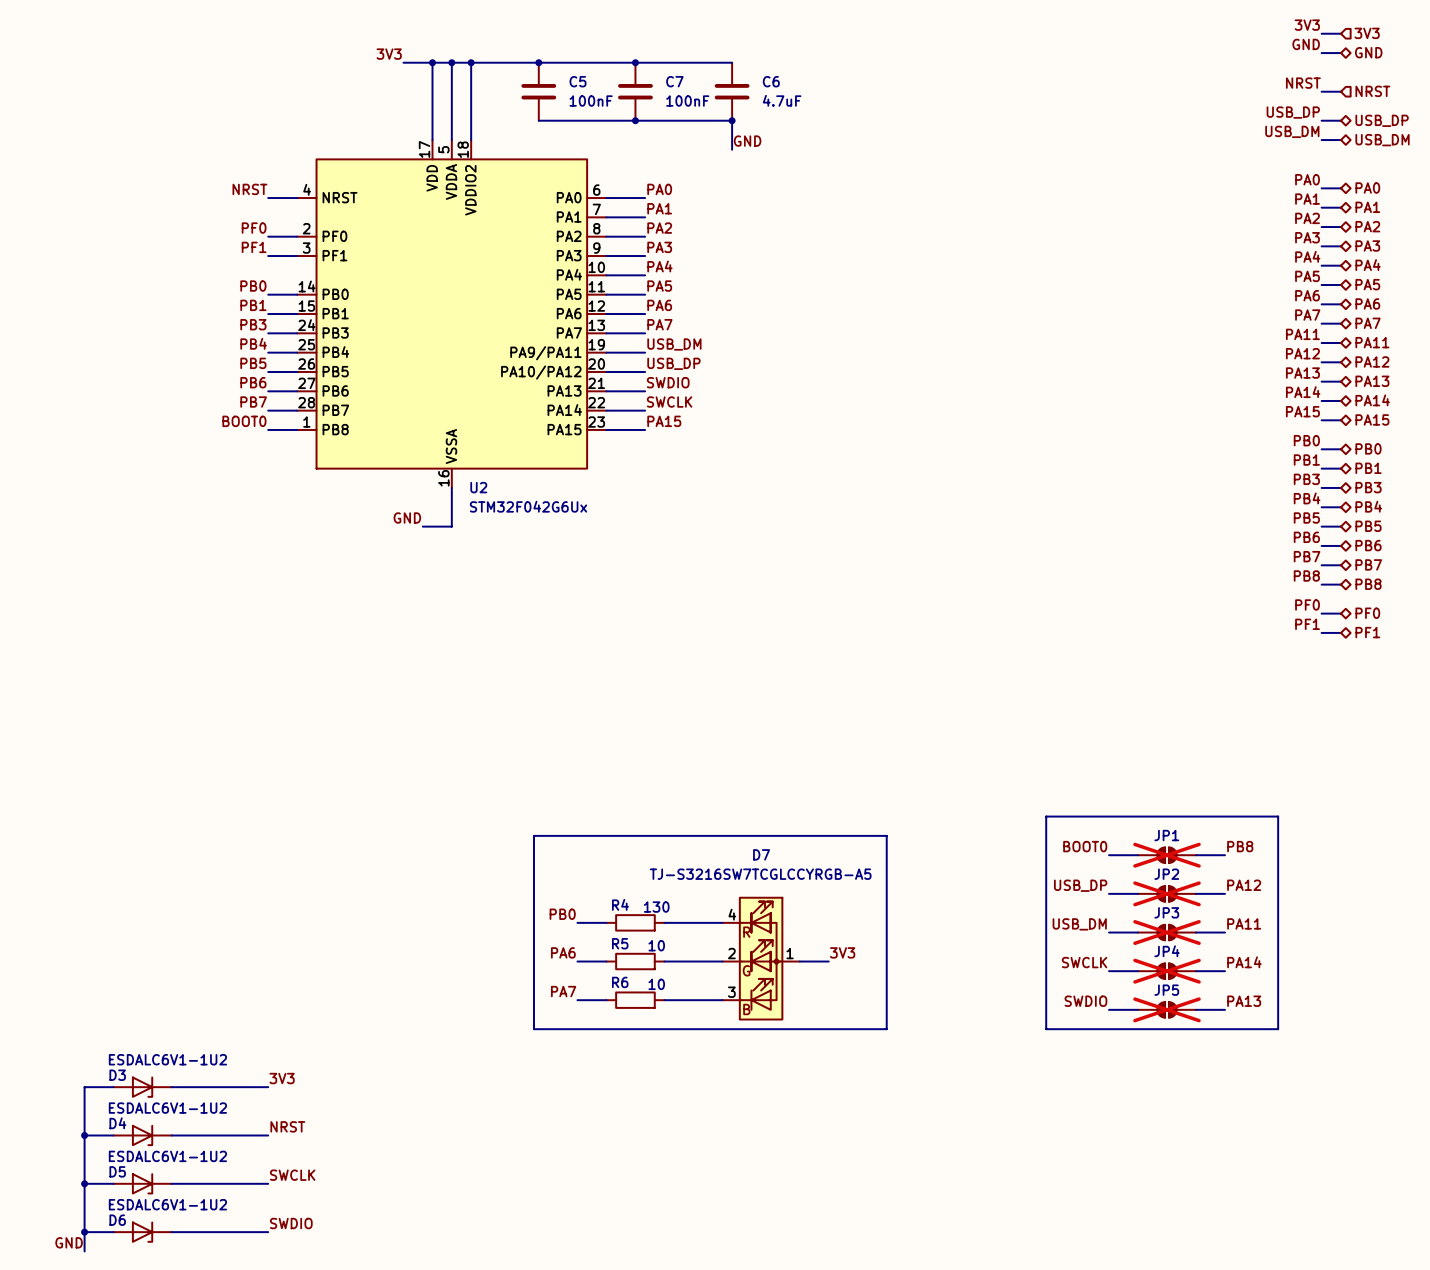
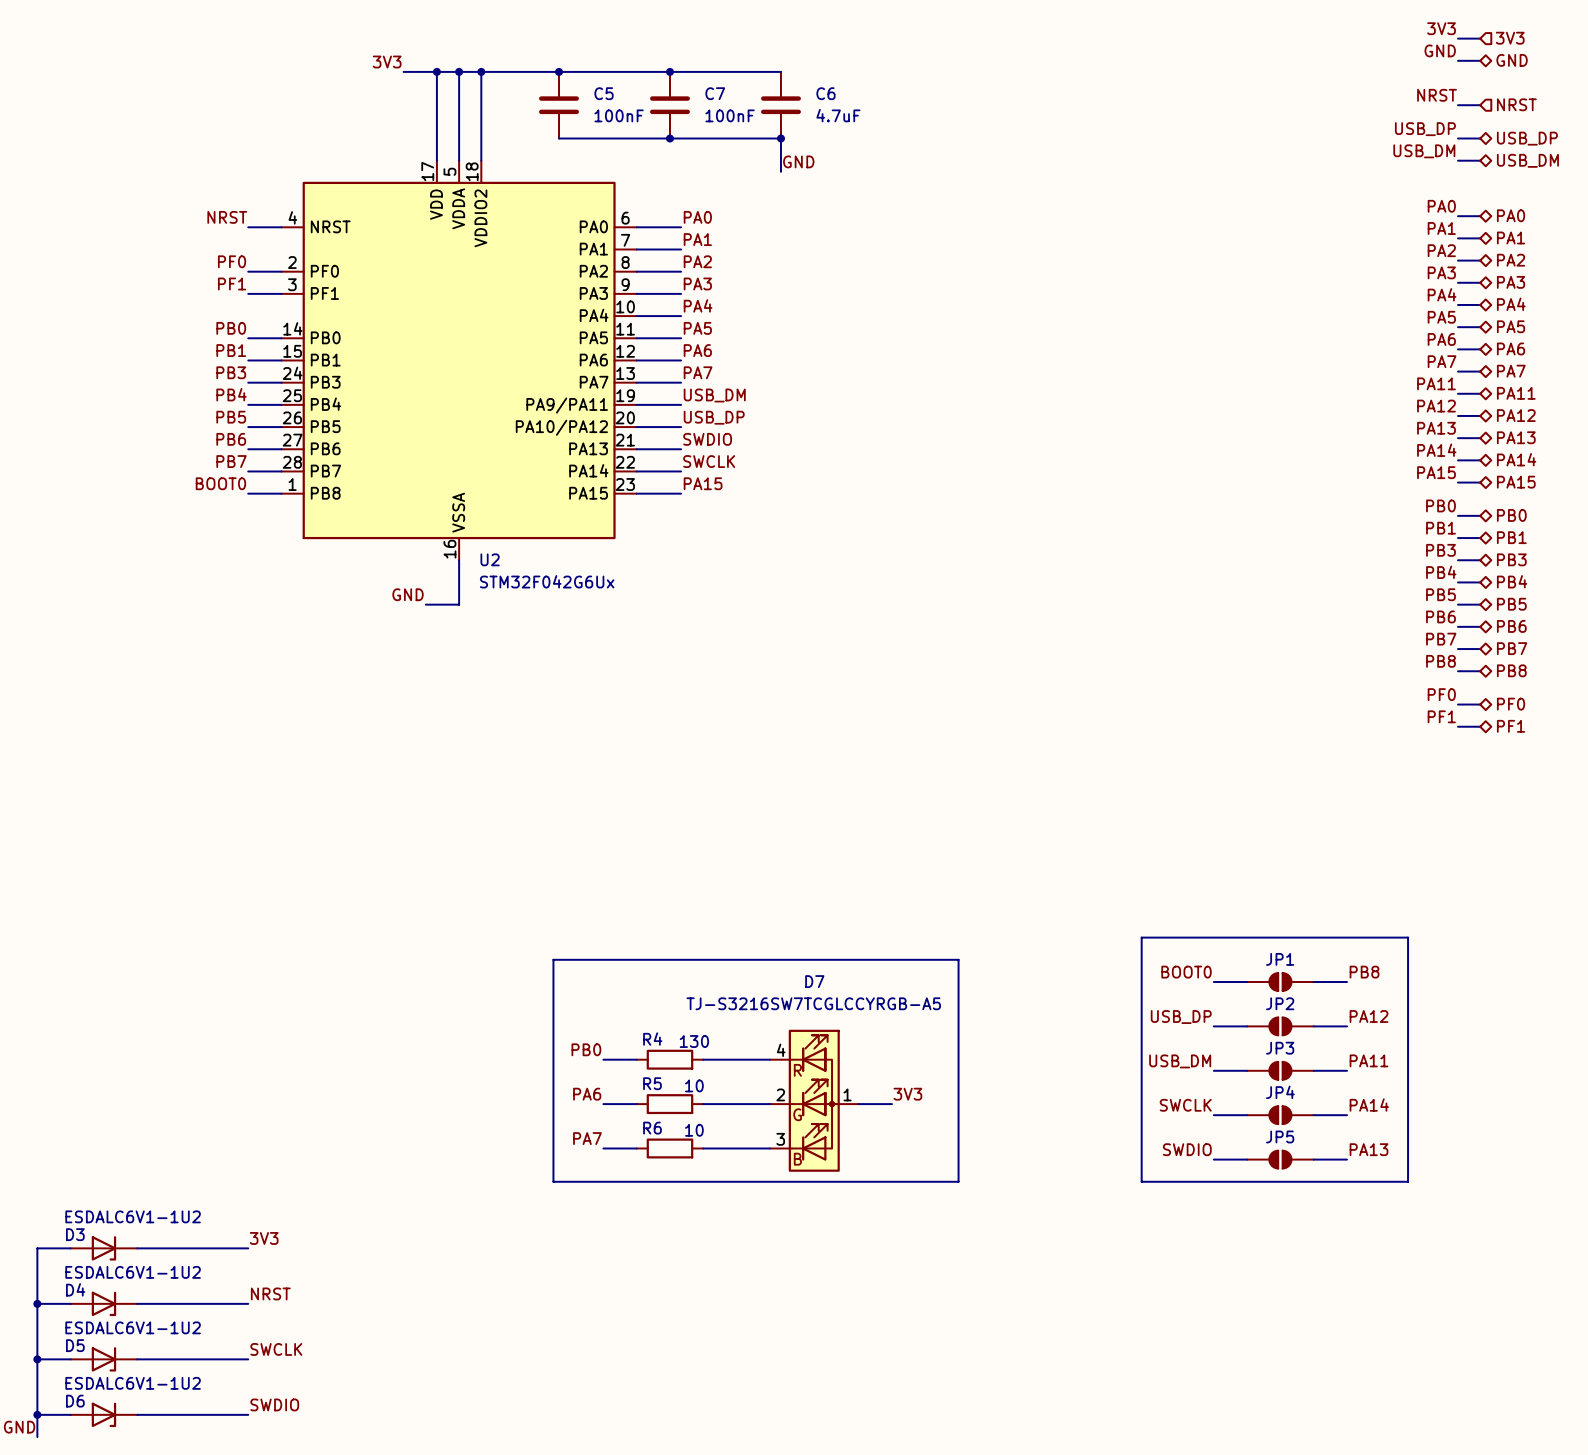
JP1 do-not-place cross: (1167, 855) -> none
JP2 do-not-place cross: (1167, 893) -> none
JP3 do-not-place cross: (1167, 932) -> none
JP4 do-not-place cross: (1167, 971) -> none
JP5 do-not-place cross: (1167, 1009) -> none

